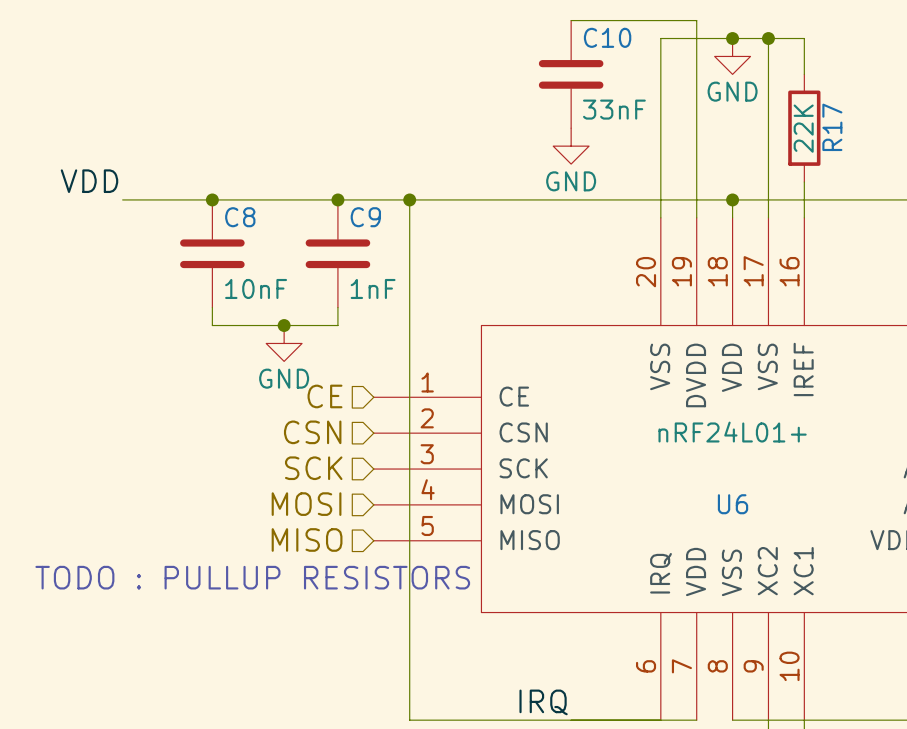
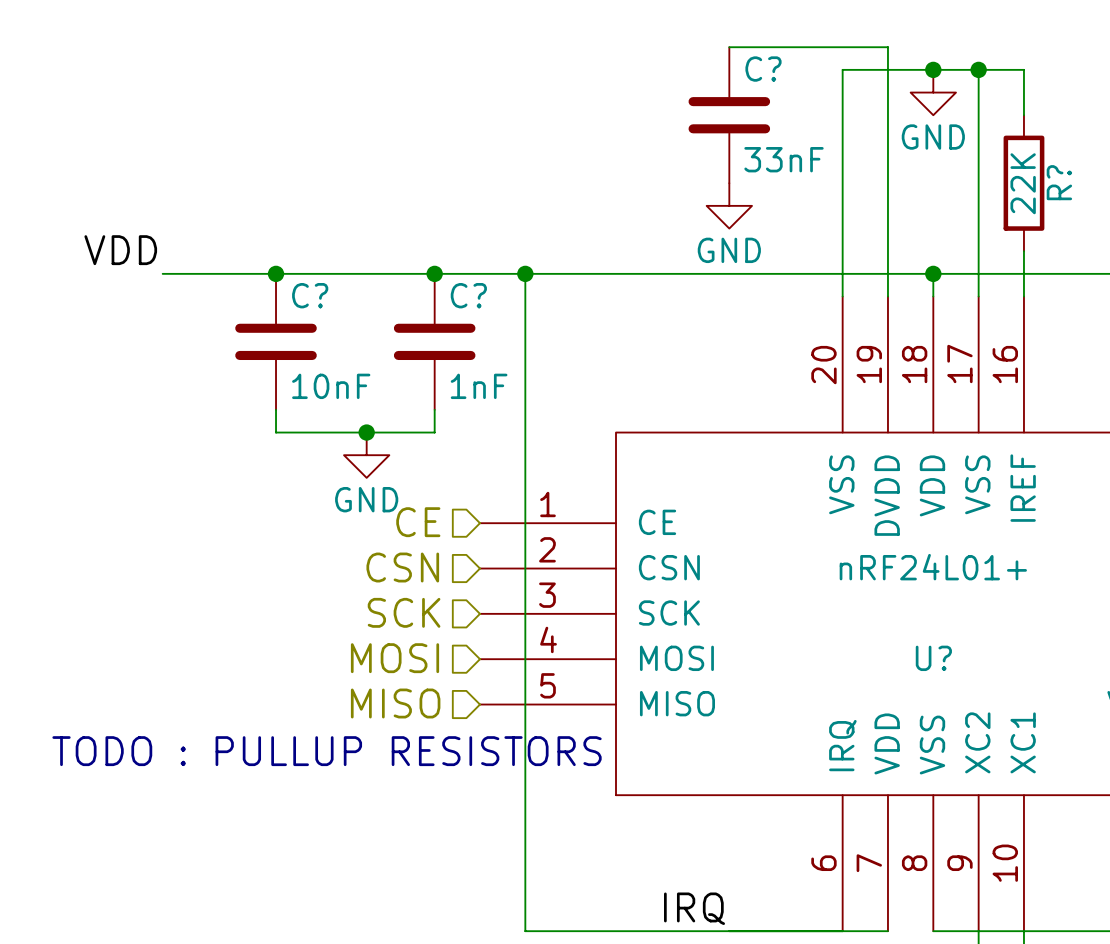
C10 name: C10 (607, 37) -> C? (763, 69)
R17 name: R17 (832, 127) -> R? (1059, 182)
C8 name: C8 (240, 217) -> C? (310, 295)
C9 name: C9 (365, 217) -> C? (468, 295)
U6 name: U6 (733, 504) -> U? (933, 658)

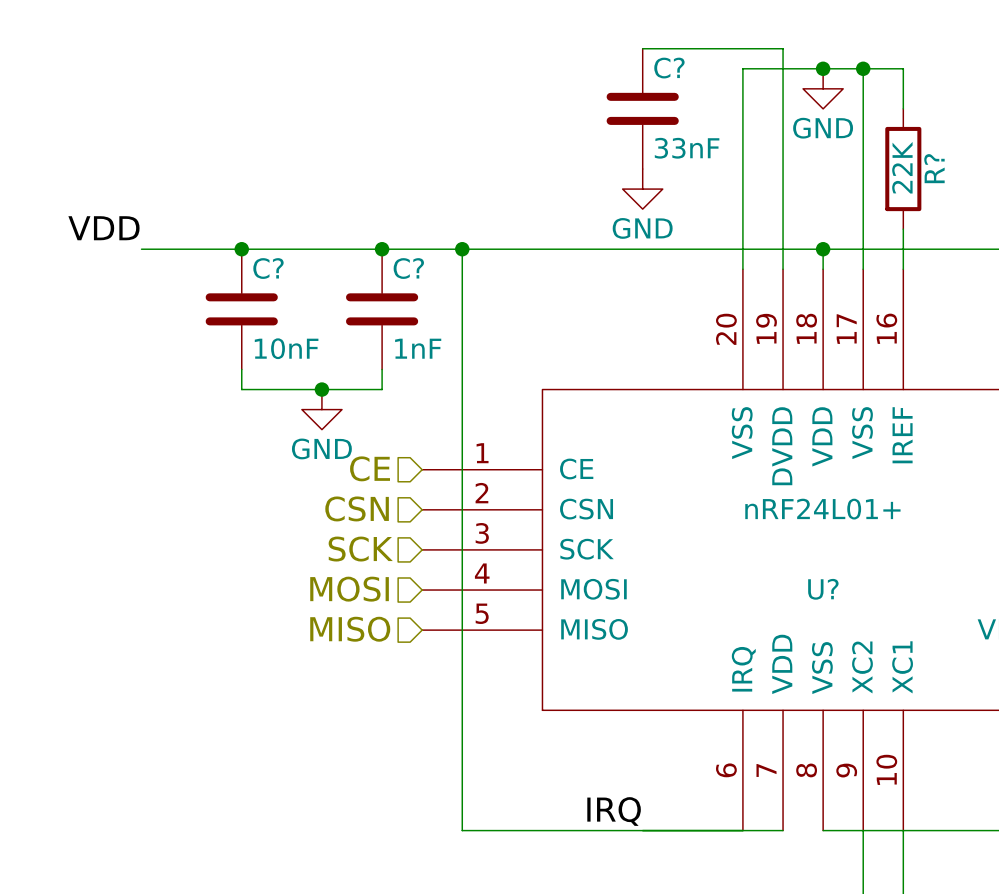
text: TODO : PULLUP RESISTORS (327, 751) -> none

